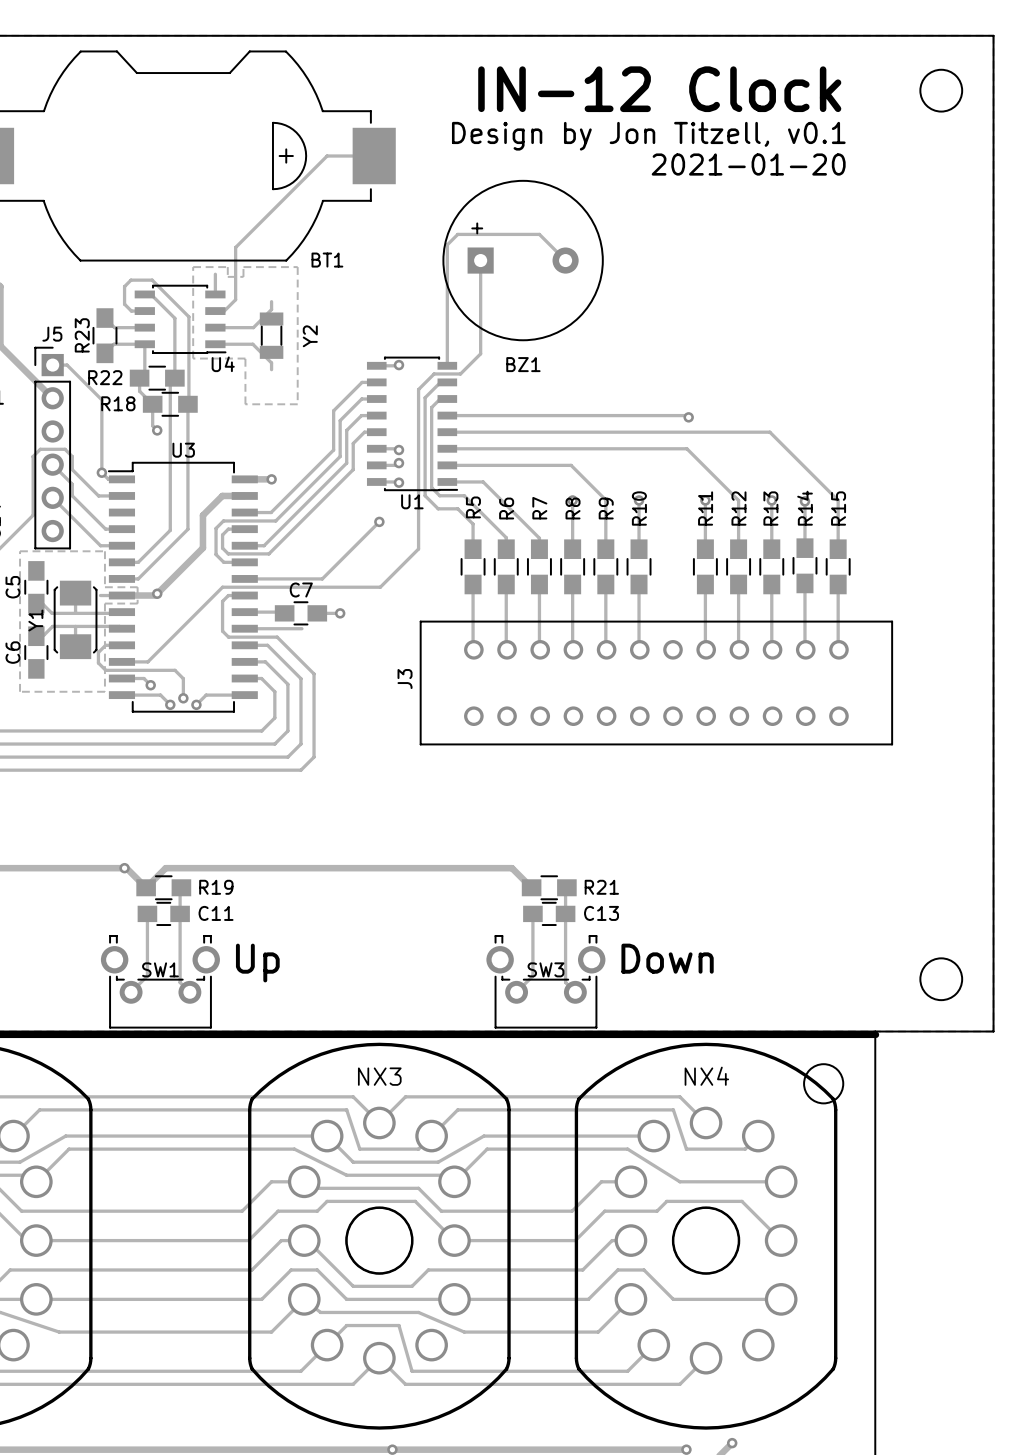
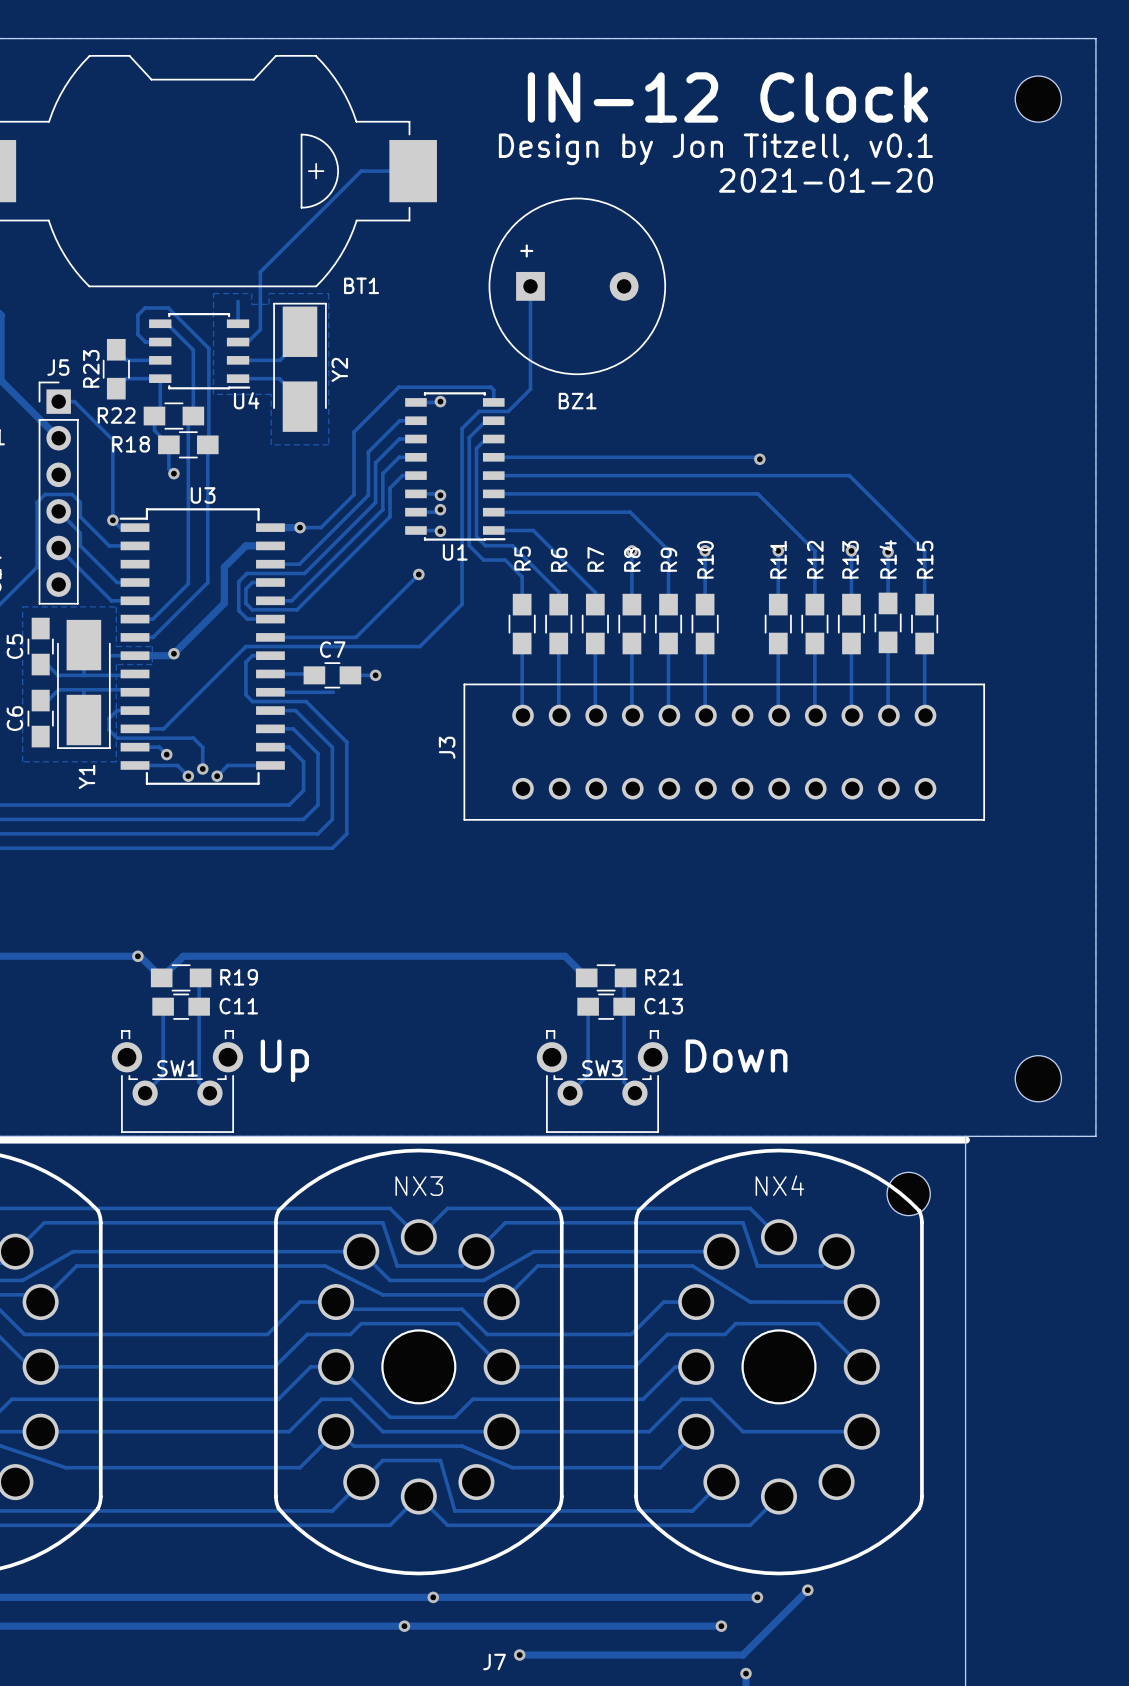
track: (565, 260) (539, 234) (457, 234) (447, 244) (447, 354) -> (300, 527) (321, 527) (354, 494) (354, 432) (398, 387) (490, 387) (493, 390)
Y2 footprint: [259, 312, 284, 359] -> [273, 302, 327, 432]
Y1 footprint: [53, 580, 98, 660] -> [57, 619, 111, 749]
Y1 name position: Y1 (35, 620) -> Y1 (86, 776)

